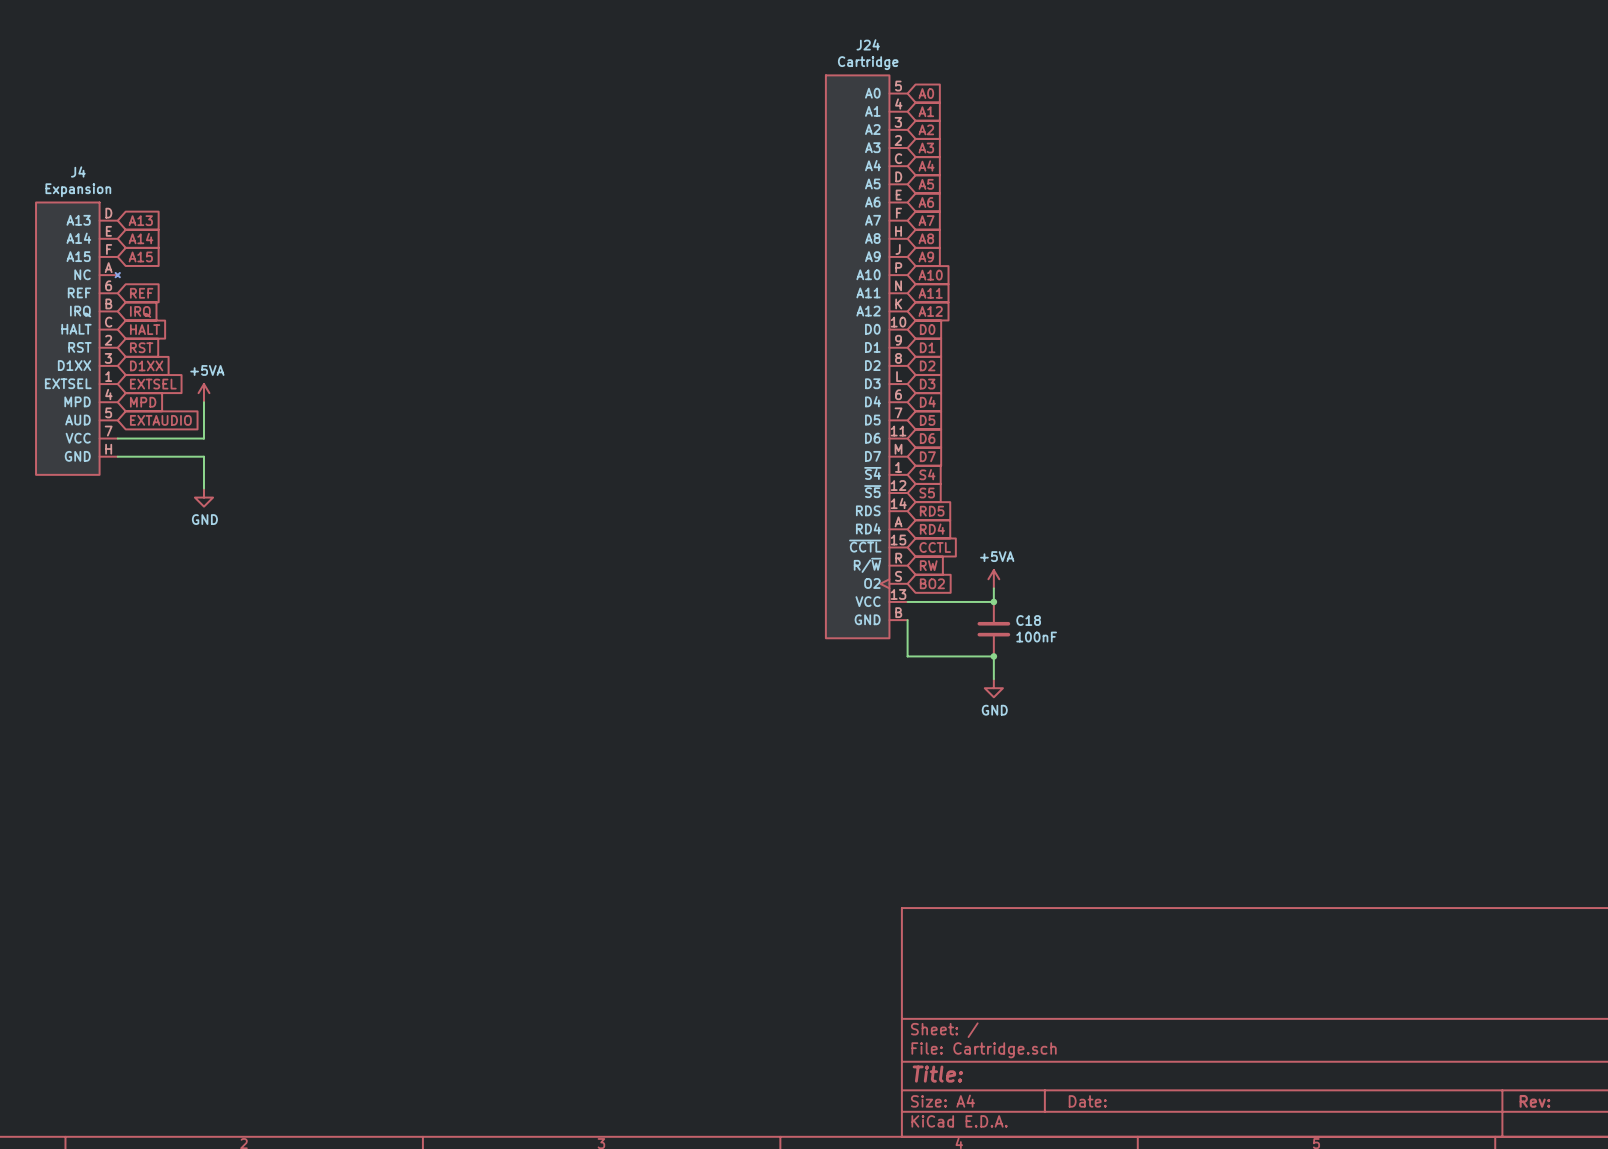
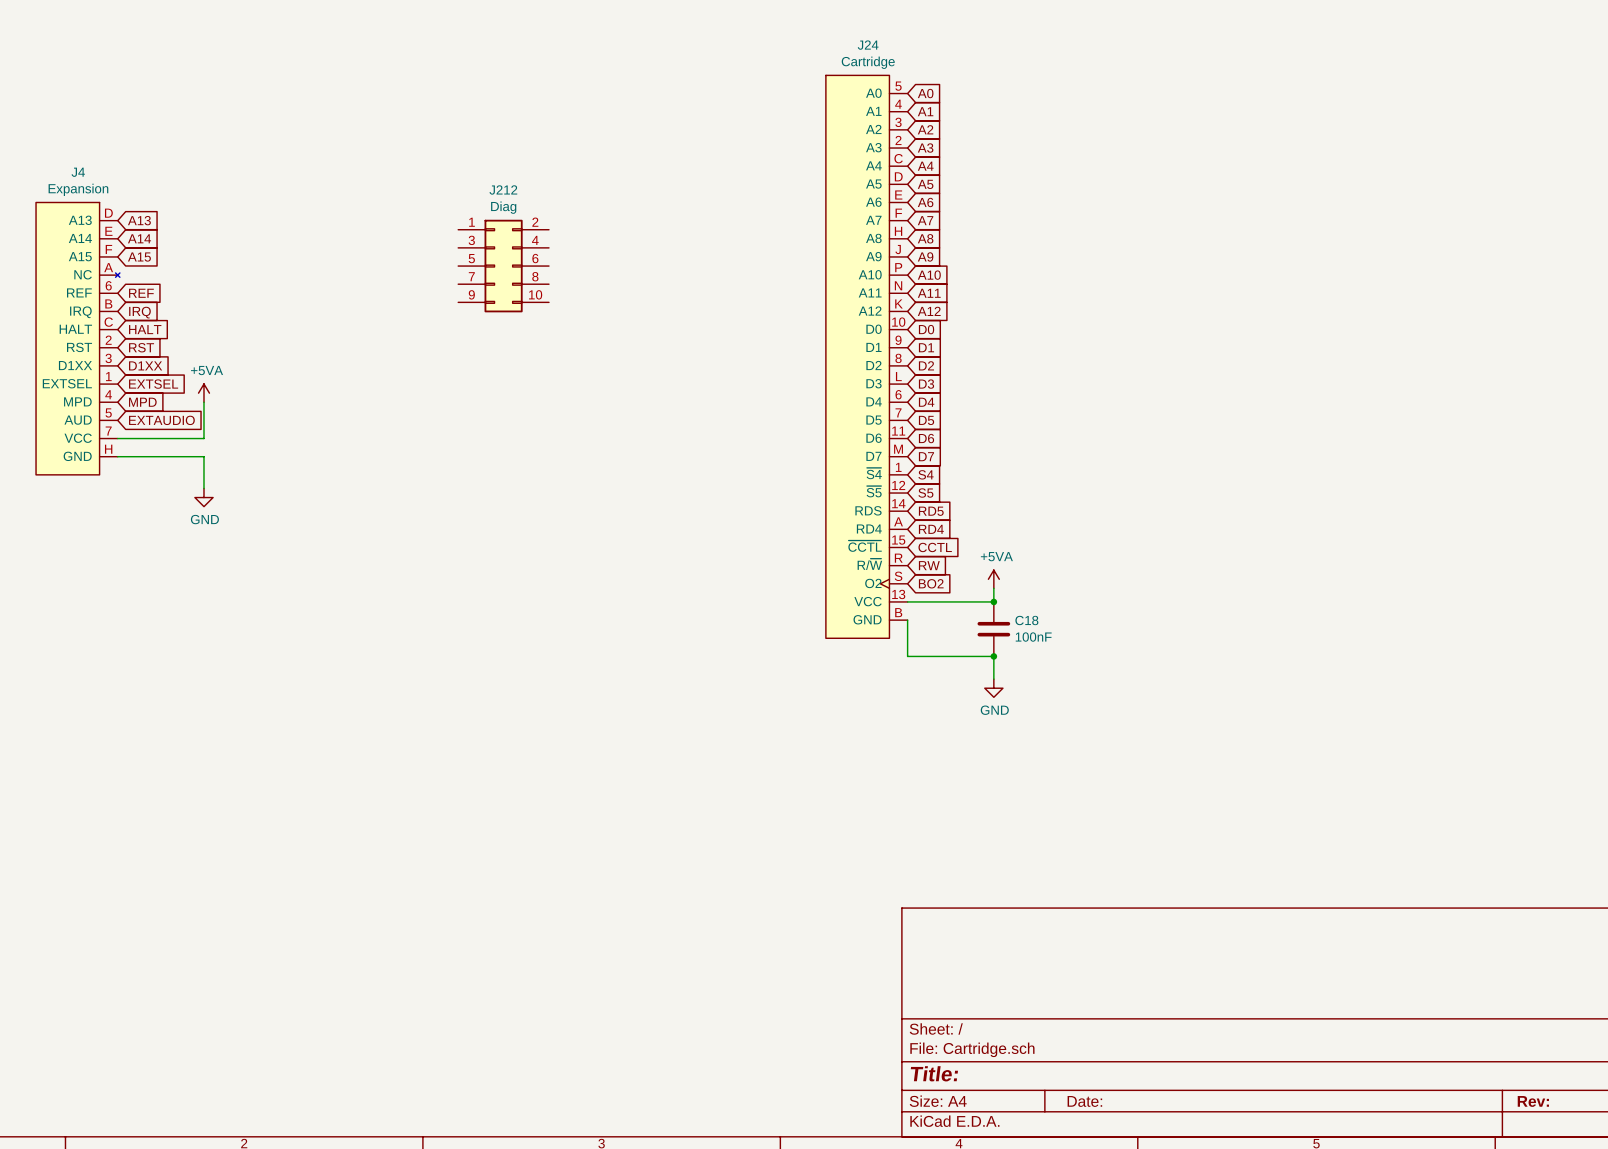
J212: none -> Diag (503, 266)

